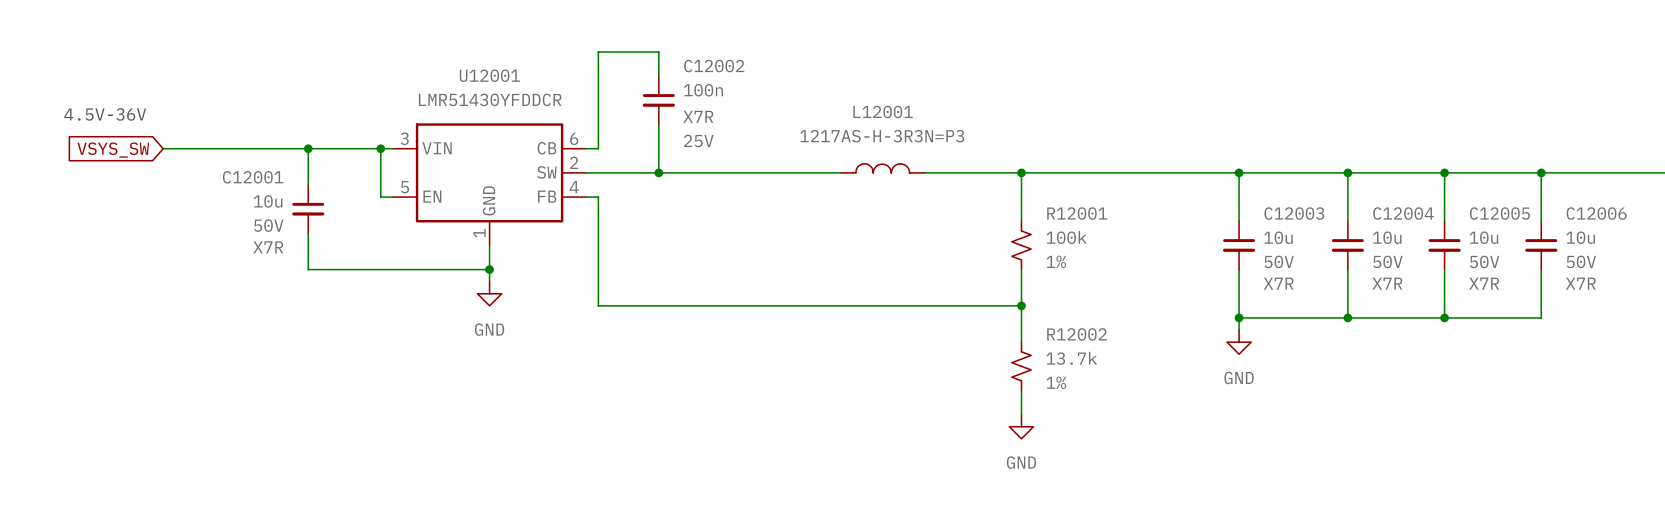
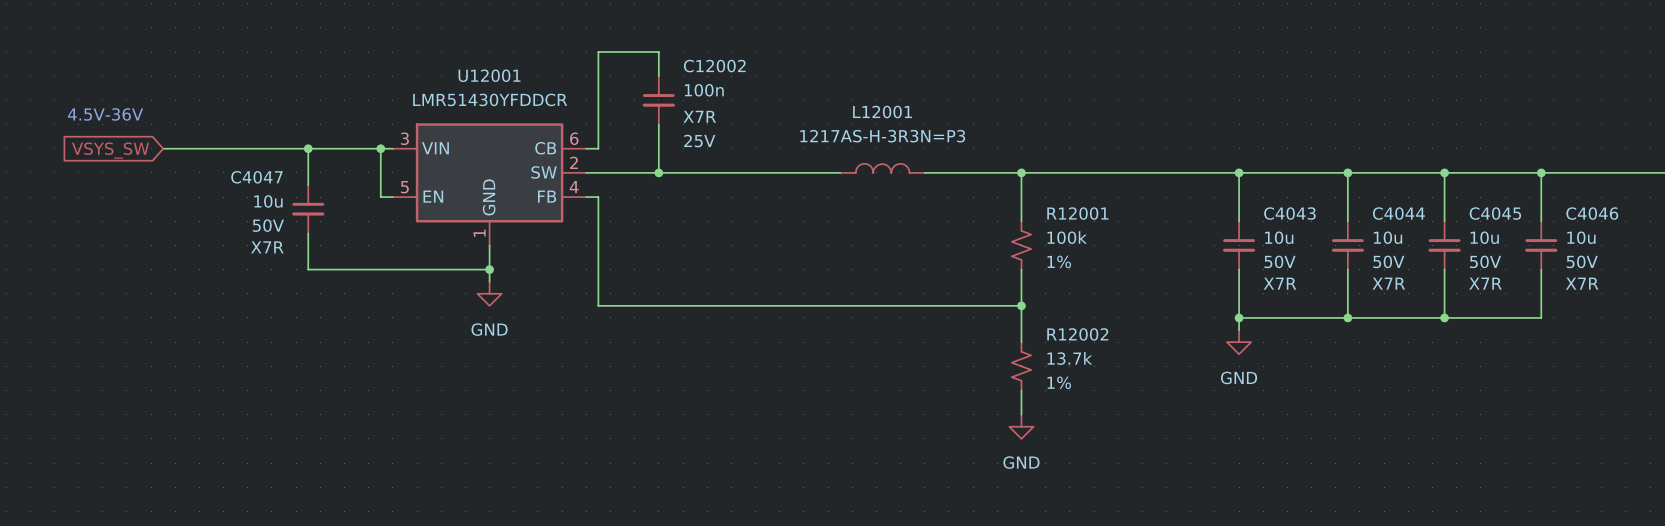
C12001 name: C12001 (253, 177) -> C4047 (256, 177)
C12003 name: C12003 (1294, 213) -> C4043 (1289, 213)
C12004 name: C12004 (1403, 213) -> C4044 (1398, 213)
C12005 name: C12005 (1499, 213) -> C4045 (1495, 213)
C12006 name: C12006 (1596, 213) -> C4046 (1592, 213)

